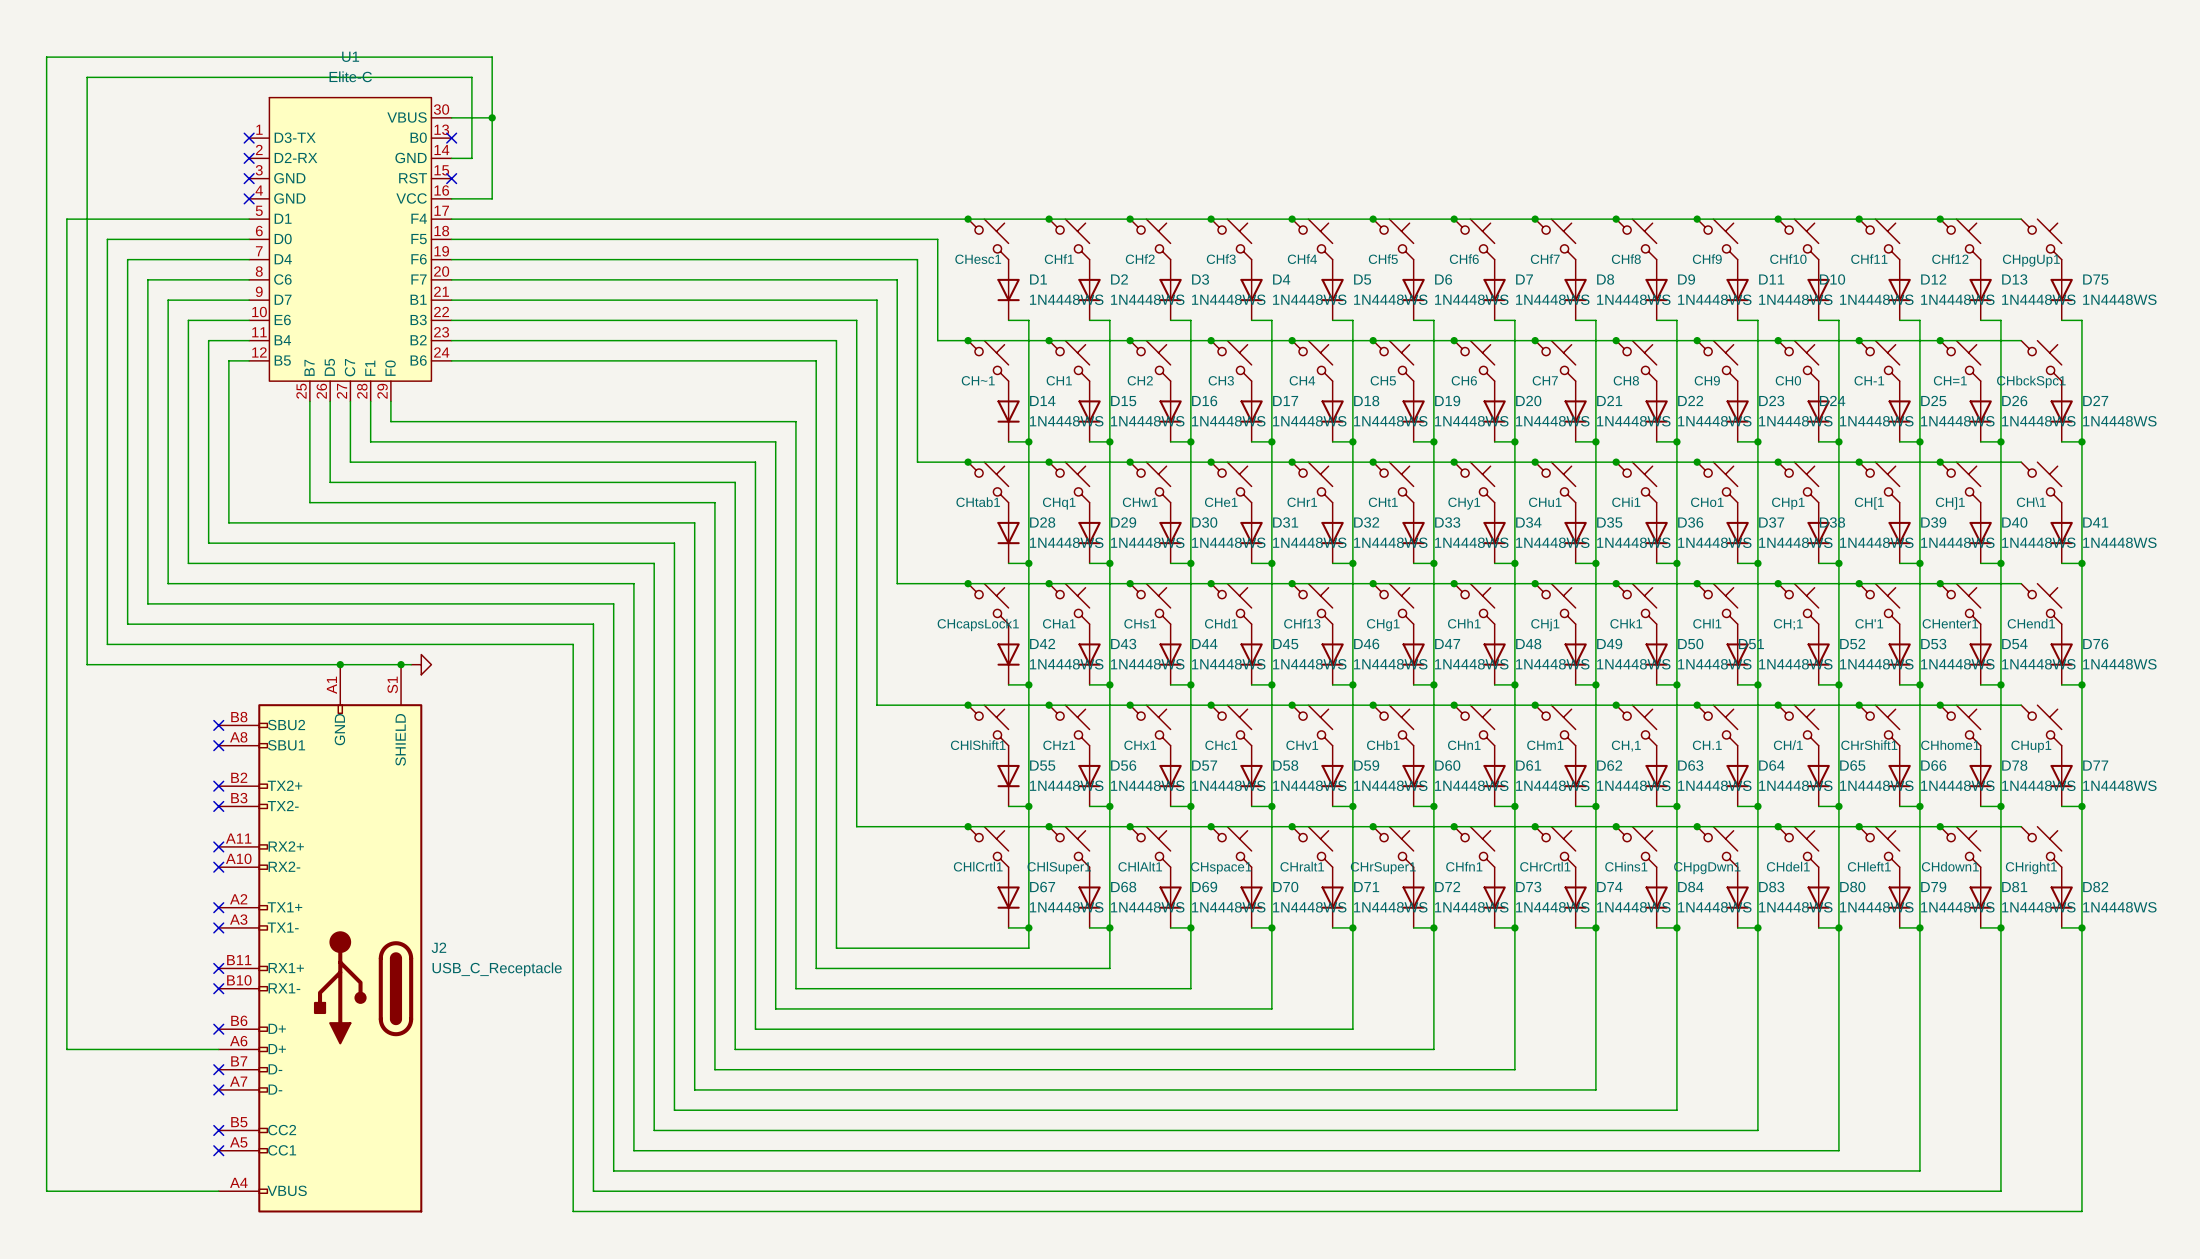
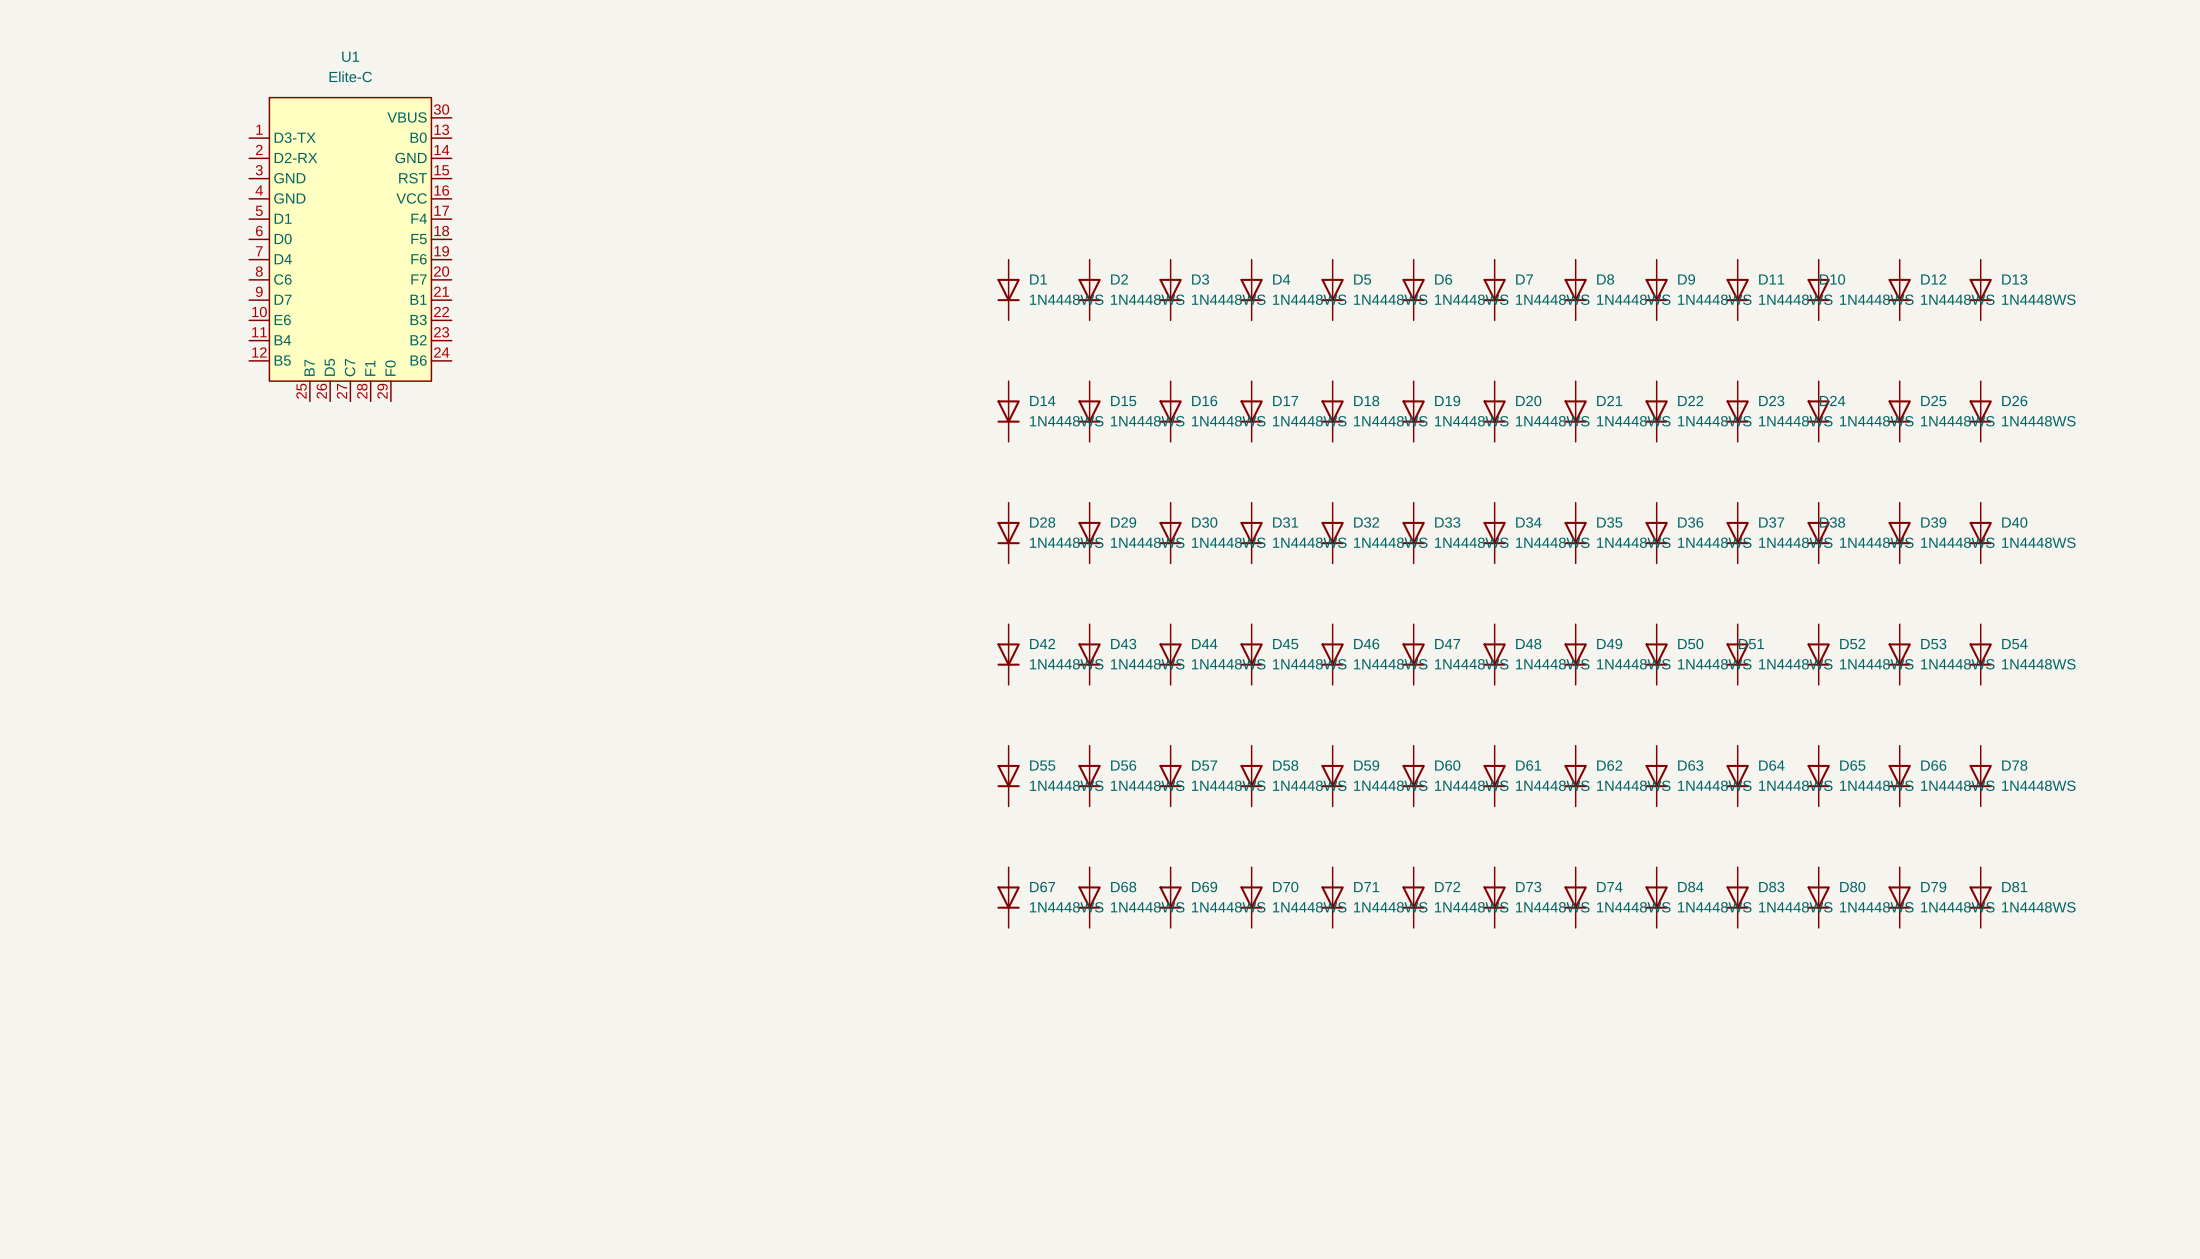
wire: (451, 117) (492, 117) -> none
junction: (492, 117) -> none
no-connect mark: (249, 138) -> none
no-connect mark: (451, 138) -> none
no-connect mark: (249, 158) -> none
wire: (451, 158) (471, 158) (471, 77) (87, 77) (87, 664) (411, 664) -> none
no-connect mark: (249, 178) -> none
no-connect mark: (451, 178) -> none
no-connect mark: (249, 198) -> none
wire: (451, 198) (492, 198) (492, 57) (46, 57) (46, 1191) (218, 1191) -> none
wire: (249, 219) (66, 219) (66, 1049) (218, 1049) -> none
wire: (451, 219) (2021, 219) -> none
junction: (968, 219) -> none
junction: (1049, 219) -> none
junction: (1130, 219) -> none
junction: (1211, 219) -> none
junction: (1292, 219) -> none
junction: (1373, 219) -> none
junction: (1454, 219) -> none
junction: (1535, 219) -> none
junction: (1616, 219) -> none
junction: (1697, 219) -> none
junction: (1778, 219) -> none
junction: (1859, 219) -> none
junction: (1940, 219) -> none
wire: (249, 239) (107, 239) (107, 644) (573, 644) (573, 1211) (2081, 1211) (2081, 320) (2061, 320) -> none
wire: (451, 239) (937, 239) (937, 340) (2021, 340) -> none
CHesc1: (988, 239) -> none
CHf1: (1069, 239) -> none
CHf2: (1150, 239) -> none
CHf3: (1231, 239) -> none
CHf4: (1312, 239) -> none
CHf5: (1393, 239) -> none
CHf6: (1474, 239) -> none
CHf7: (1555, 239) -> none
CHf8: (1636, 239) -> none
CHf9: (1717, 239) -> none
CHf10: (1798, 239) -> none
CHf11: (1879, 239) -> none
CHf12: (1960, 239) -> none
CHpgUp1: (2041, 239) -> none
wire: (249, 259) (127, 259) (127, 624) (593, 624) (593, 1191) (2000, 1191) (2000, 320) (1980, 320) -> none
wire: (451, 259) (917, 259) (917, 462) (2021, 462) -> none
wire: (249, 279) (147, 279) (147, 603) (613, 603) (613, 1170) (1919, 1170) (1919, 320) (1899, 320) -> none
wire: (451, 279) (897, 279) (897, 583) (2021, 583) -> none
D75: 1N4448WS (2061, 290) -> none
wire: (249, 300) (168, 300) (168, 583) (633, 583) (633, 1150) (1838, 1150) (1838, 320) (1818, 320) -> none
wire: (451, 300) (876, 300) (876, 705) (2021, 705) -> none
wire: (249, 320) (188, 320) (188, 563) (654, 563) (654, 1130) (1757, 1130) (1757, 320) (1737, 320) -> none
wire: (451, 320) (856, 320) (856, 826) (2021, 826) -> none
wire: (1008, 320) (1028, 320) (1028, 948) (836, 948) (836, 340) (451, 340) -> none
wire: (1089, 320) (1109, 320) (1109, 968) (816, 968) (816, 360) (451, 360) -> none
wire: (1170, 320) (1190, 320) (1190, 988) (795, 988) (795, 421) (390, 421) (390, 401) -> none
wire: (1251, 320) (1271, 320) (1271, 1008) (775, 1008) (775, 441) (370, 441) (370, 401) -> none
wire: (1332, 320) (1352, 320) (1352, 1029) (755, 1029) (755, 462) (350, 462) (350, 401) -> none
wire: (1413, 320) (1433, 320) (1433, 1049) (735, 1049) (735, 482) (330, 482) (330, 401) -> none
wire: (1494, 320) (1514, 320) (1514, 1069) (714, 1069) (714, 502) (309, 502) (309, 401) -> none
wire: (1575, 320) (1595, 320) (1595, 1089) (694, 1089) (694, 522) (228, 522) (228, 360) (249, 360) -> none
wire: (1656, 320) (1676, 320) (1676, 1110) (674, 1110) (674, 543) (208, 543) (208, 340) (249, 340) -> none
junction: (968, 340) -> none
junction: (1049, 340) -> none
junction: (1130, 340) -> none
junction: (1211, 340) -> none
junction: (1292, 340) -> none
junction: (1373, 340) -> none
junction: (1454, 340) -> none
junction: (1535, 340) -> none
junction: (1616, 340) -> none
junction: (1697, 340) -> none
junction: (1778, 340) -> none
junction: (1859, 340) -> none
junction: (1940, 340) -> none
CH~1: (988, 360) -> none
CH1: (1069, 360) -> none
CH2: (1150, 360) -> none
CH3: (1231, 360) -> none
CH4: (1312, 360) -> none
CH5: (1393, 360) -> none
CH6: (1474, 360) -> none
CH7: (1555, 360) -> none
CH8: (1636, 360) -> none
CH9: (1717, 360) -> none
CH0: (1798, 360) -> none
CH-1: (1879, 360) -> none
CH=1: (1960, 360) -> none
CHbckSpc1: (2041, 360) -> none
D27: 1N4448WS (2061, 411) -> none
wire: (1008, 441) (1028, 441) -> none
junction: (1028, 441) -> none
wire: (1089, 441) (1109, 441) -> none
junction: (1109, 441) -> none
wire: (1170, 441) (1190, 441) -> none
junction: (1190, 441) -> none
wire: (1251, 441) (1271, 441) -> none
junction: (1271, 441) -> none
wire: (1332, 441) (1352, 441) -> none
junction: (1352, 441) -> none
wire: (1413, 441) (1433, 441) -> none
junction: (1433, 441) -> none
wire: (1494, 441) (1514, 441) -> none
junction: (1514, 441) -> none
wire: (1575, 441) (1595, 441) -> none
junction: (1595, 441) -> none
wire: (1656, 441) (1676, 441) -> none
junction: (1676, 441) -> none
wire: (1737, 441) (1757, 441) -> none
junction: (1757, 441) -> none
wire: (1818, 441) (1838, 441) -> none
junction: (1838, 441) -> none
wire: (1899, 441) (1919, 441) -> none
junction: (1919, 441) -> none
wire: (1980, 441) (2000, 441) -> none
junction: (2000, 441) -> none
wire: (2061, 441) (2081, 441) -> none
junction: (2081, 441) -> none
junction: (968, 462) -> none
junction: (1049, 462) -> none
junction: (1130, 462) -> none
junction: (1211, 462) -> none
junction: (1292, 462) -> none
junction: (1373, 462) -> none
junction: (1454, 462) -> none
junction: (1535, 462) -> none
junction: (1616, 462) -> none
junction: (1697, 462) -> none
junction: (1778, 462) -> none
junction: (1859, 462) -> none
junction: (1940, 462) -> none
CHtab1: (988, 482) -> none
CHq1: (1069, 482) -> none
CHw1: (1150, 482) -> none
CHe1: (1231, 482) -> none
CHr1: (1312, 482) -> none
CHt1: (1393, 482) -> none
CHy1: (1474, 482) -> none
CHu1: (1555, 482) -> none
CHi1: (1636, 482) -> none
CHo1: (1717, 482) -> none
CHp1: (1798, 482) -> none
CH[1: (1879, 482) -> none
CH]1: (1960, 482) -> none
CH\1: (2041, 482) -> none
D41: 1N4448WS (2061, 533) -> none
wire: (1008, 563) (1028, 563) -> none
junction: (1028, 563) -> none
wire: (1089, 563) (1109, 563) -> none
junction: (1109, 563) -> none
wire: (1170, 563) (1190, 563) -> none
junction: (1190, 563) -> none
wire: (1251, 563) (1271, 563) -> none
junction: (1271, 563) -> none
wire: (1332, 563) (1352, 563) -> none
junction: (1352, 563) -> none
wire: (1413, 563) (1433, 563) -> none
junction: (1433, 563) -> none
wire: (1494, 563) (1514, 563) -> none
junction: (1514, 563) -> none
wire: (1575, 563) (1595, 563) -> none
junction: (1595, 563) -> none
wire: (1656, 563) (1676, 563) -> none
junction: (1676, 563) -> none
wire: (1737, 563) (1757, 563) -> none
junction: (1757, 563) -> none
wire: (1818, 563) (1838, 563) -> none
junction: (1838, 563) -> none
wire: (1899, 563) (1919, 563) -> none
junction: (1919, 563) -> none
wire: (1980, 563) (2000, 563) -> none
junction: (2000, 563) -> none
wire: (2061, 563) (2081, 563) -> none
junction: (2081, 563) -> none
junction: (968, 583) -> none
junction: (1049, 583) -> none
junction: (1130, 583) -> none
junction: (1211, 583) -> none
junction: (1292, 583) -> none
junction: (1373, 583) -> none
junction: (1454, 583) -> none
junction: (1535, 583) -> none
junction: (1616, 583) -> none
junction: (1697, 583) -> none
junction: (1778, 583) -> none
junction: (1859, 583) -> none
junction: (1940, 583) -> none
CHcapsLock1: (988, 603) -> none
CHa1: (1069, 603) -> none
CHs1: (1150, 603) -> none
CHd1: (1231, 603) -> none
CHf13: (1312, 603) -> none
CHg1: (1393, 603) -> none
CHh1: (1474, 603) -> none
CHj1: (1555, 603) -> none
CHk1: (1636, 603) -> none
CHl1: (1717, 603) -> none
CH;1: (1798, 603) -> none
CH'1: (1879, 603) -> none
CHenter1: (1960, 603) -> none
CHend1: (2041, 603) -> none
D76: 1N4448WS (2061, 654) -> none
junction: (340, 664) -> none
junction: (401, 664) -> none
power symbol: (421, 664) -> none
wire: (1008, 684) (1028, 684) -> none
junction: (1028, 684) -> none
wire: (1089, 684) (1109, 684) -> none
junction: (1109, 684) -> none
wire: (1170, 684) (1190, 684) -> none
junction: (1190, 684) -> none
wire: (1251, 684) (1271, 684) -> none
junction: (1271, 684) -> none
wire: (1332, 684) (1352, 684) -> none
junction: (1352, 684) -> none
wire: (1413, 684) (1433, 684) -> none
junction: (1433, 684) -> none
wire: (1494, 684) (1514, 684) -> none
junction: (1514, 684) -> none
wire: (1575, 684) (1595, 684) -> none
junction: (1595, 684) -> none
wire: (1656, 684) (1676, 684) -> none
junction: (1676, 684) -> none
wire: (1737, 684) (1757, 684) -> none
junction: (1757, 684) -> none
wire: (1818, 684) (1838, 684) -> none
junction: (1838, 684) -> none
wire: (1899, 684) (1919, 684) -> none
junction: (1919, 684) -> none
wire: (1980, 684) (2000, 684) -> none
junction: (2000, 684) -> none
wire: (2061, 684) (2081, 684) -> none
junction: (2081, 684) -> none
junction: (968, 705) -> none
junction: (1049, 705) -> none
junction: (1130, 705) -> none
junction: (1211, 705) -> none
junction: (1292, 705) -> none
junction: (1373, 705) -> none
junction: (1454, 705) -> none
junction: (1535, 705) -> none
junction: (1616, 705) -> none
junction: (1697, 705) -> none
junction: (1778, 705) -> none
junction: (1859, 705) -> none
junction: (1940, 705) -> none
no-connect mark: (218, 725) -> none
CHlShift1: (988, 725) -> none
CHz1: (1069, 725) -> none
CHx1: (1150, 725) -> none
CHc1: (1231, 725) -> none
CHv1: (1312, 725) -> none
CHb1: (1393, 725) -> none
CHn1: (1474, 725) -> none
CHm1: (1555, 725) -> none
CH,1: (1636, 725) -> none
CH.1: (1717, 725) -> none
CH/1: (1798, 725) -> none
CHrShift1: (1879, 725) -> none
CHhome1: (1960, 725) -> none
CHup1: (2041, 725) -> none
no-connect mark: (218, 745) -> none
D77: 1N4448WS (2061, 776) -> none
no-connect mark: (218, 786) -> none
no-connect mark: (218, 806) -> none
wire: (1008, 806) (1028, 806) -> none
junction: (1028, 806) -> none
wire: (1089, 806) (1109, 806) -> none
junction: (1109, 806) -> none
wire: (1170, 806) (1190, 806) -> none
junction: (1190, 806) -> none
wire: (1251, 806) (1271, 806) -> none
junction: (1271, 806) -> none
wire: (1332, 806) (1352, 806) -> none
junction: (1352, 806) -> none
wire: (1413, 806) (1433, 806) -> none
junction: (1433, 806) -> none
wire: (1494, 806) (1514, 806) -> none
junction: (1514, 806) -> none
wire: (1575, 806) (1595, 806) -> none
junction: (1595, 806) -> none
wire: (1656, 806) (1676, 806) -> none
junction: (1676, 806) -> none
wire: (1737, 806) (1757, 806) -> none
junction: (1757, 806) -> none
wire: (1818, 806) (1838, 806) -> none
junction: (1838, 806) -> none
wire: (1899, 806) (1919, 806) -> none
junction: (1919, 806) -> none
wire: (1980, 806) (2000, 806) -> none
junction: (2000, 806) -> none
wire: (2061, 806) (2081, 806) -> none
junction: (2081, 806) -> none
junction: (968, 826) -> none
junction: (1049, 826) -> none
junction: (1130, 826) -> none
junction: (1211, 826) -> none
junction: (1292, 826) -> none
junction: (1373, 826) -> none
junction: (1454, 826) -> none
junction: (1535, 826) -> none
junction: (1616, 826) -> none
junction: (1697, 826) -> none
junction: (1778, 826) -> none
junction: (1859, 826) -> none
junction: (1940, 826) -> none
no-connect mark: (218, 846) -> none
CHlCrtl1: (988, 846) -> none
CHlSuper1: (1069, 846) -> none
CHlAlt1: (1150, 846) -> none
CHspace1: (1231, 846) -> none
CHralt1: (1312, 846) -> none
CHrSuper1: (1393, 846) -> none
CHfn1: (1474, 846) -> none
CHrCrtl1: (1555, 846) -> none
CHins1: (1636, 846) -> none
CHpgDwn1: (1717, 846) -> none
CHdel1: (1798, 846) -> none
CHleft1: (1879, 846) -> none
CHdown1: (1960, 846) -> none
CHright1: (2041, 846) -> none
no-connect mark: (218, 867) -> none
D82: 1N4448WS (2061, 897) -> none
no-connect mark: (218, 907) -> none
no-connect mark: (218, 927) -> none
wire: (1008, 927) (1028, 927) -> none
junction: (1028, 927) -> none
wire: (1089, 927) (1109, 927) -> none
junction: (1109, 927) -> none
wire: (1170, 927) (1190, 927) -> none
junction: (1190, 927) -> none
wire: (1251, 927) (1271, 927) -> none
junction: (1271, 927) -> none
wire: (1332, 927) (1352, 927) -> none
junction: (1352, 927) -> none
wire: (1413, 927) (1433, 927) -> none
junction: (1433, 927) -> none
wire: (1494, 927) (1514, 927) -> none
junction: (1514, 927) -> none
wire: (1575, 927) (1595, 927) -> none
junction: (1595, 927) -> none
wire: (1656, 927) (1676, 927) -> none
junction: (1676, 927) -> none
wire: (1737, 927) (1757, 927) -> none
junction: (1757, 927) -> none
wire: (1818, 927) (1838, 927) -> none
junction: (1838, 927) -> none
wire: (1899, 927) (1919, 927) -> none
junction: (1919, 927) -> none
wire: (1980, 927) (2000, 927) -> none
junction: (2000, 927) -> none
wire: (2061, 927) (2081, 927) -> none
junction: (2081, 927) -> none
J2: USB_C_Receptacle (320, 938) -> none
no-connect mark: (218, 968) -> none
no-connect mark: (218, 988) -> none
no-connect mark: (218, 1029) -> none
no-connect mark: (218, 1069) -> none
no-connect mark: (218, 1089) -> none
no-connect mark: (218, 1130) -> none
no-connect mark: (218, 1150) -> none

